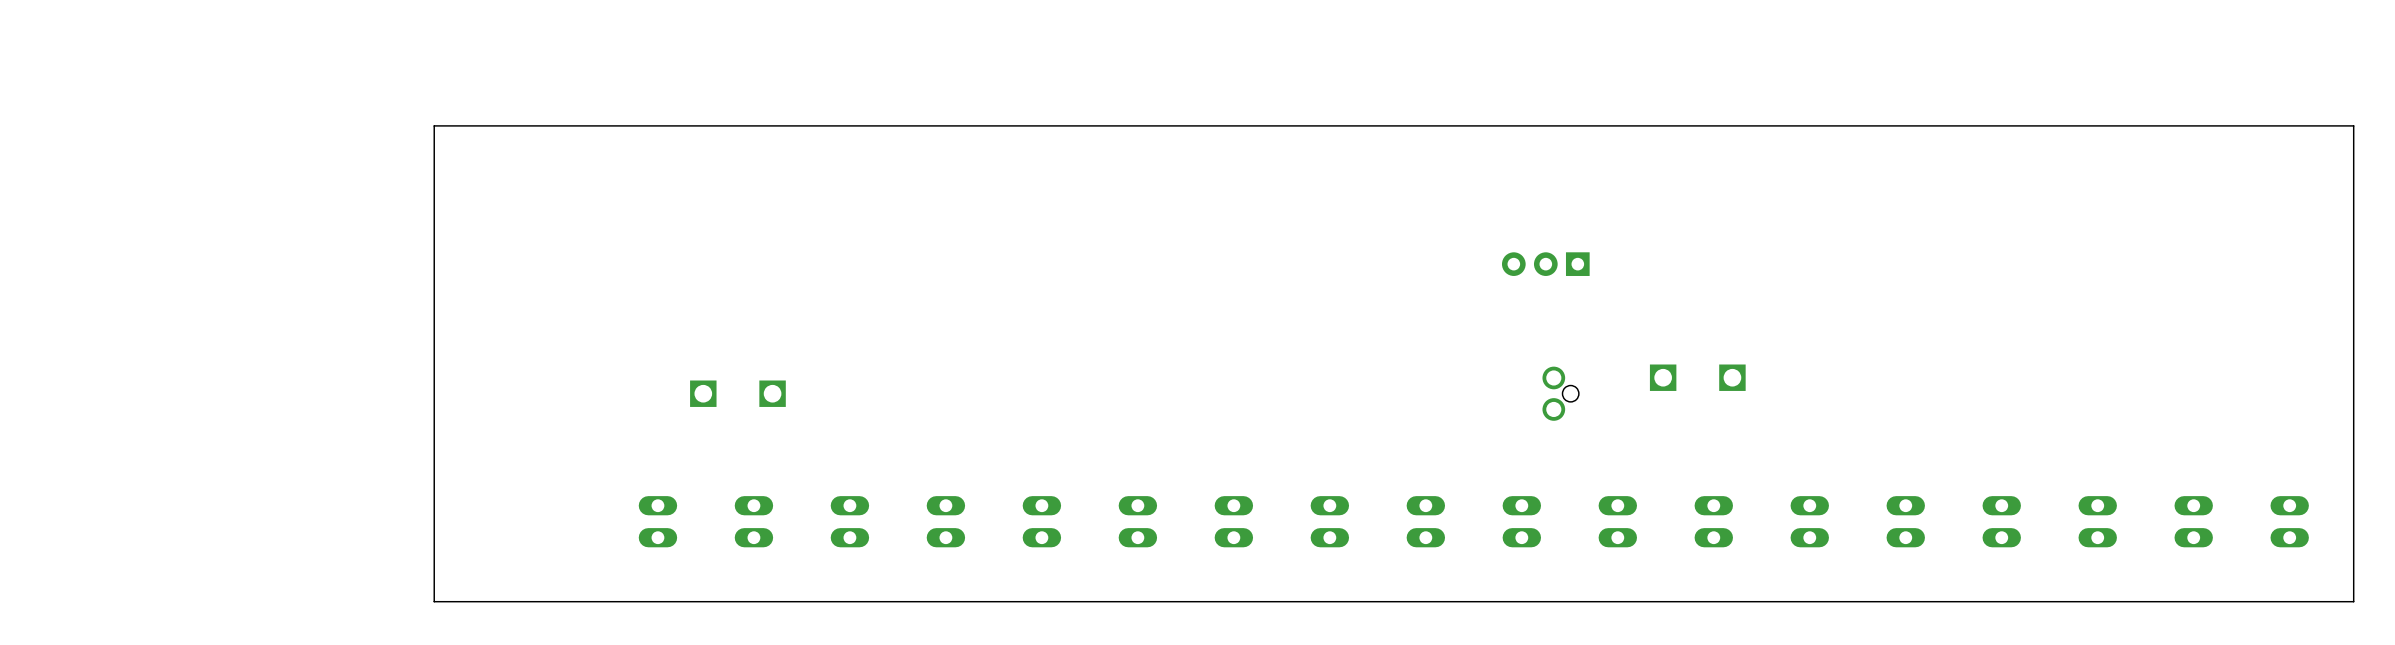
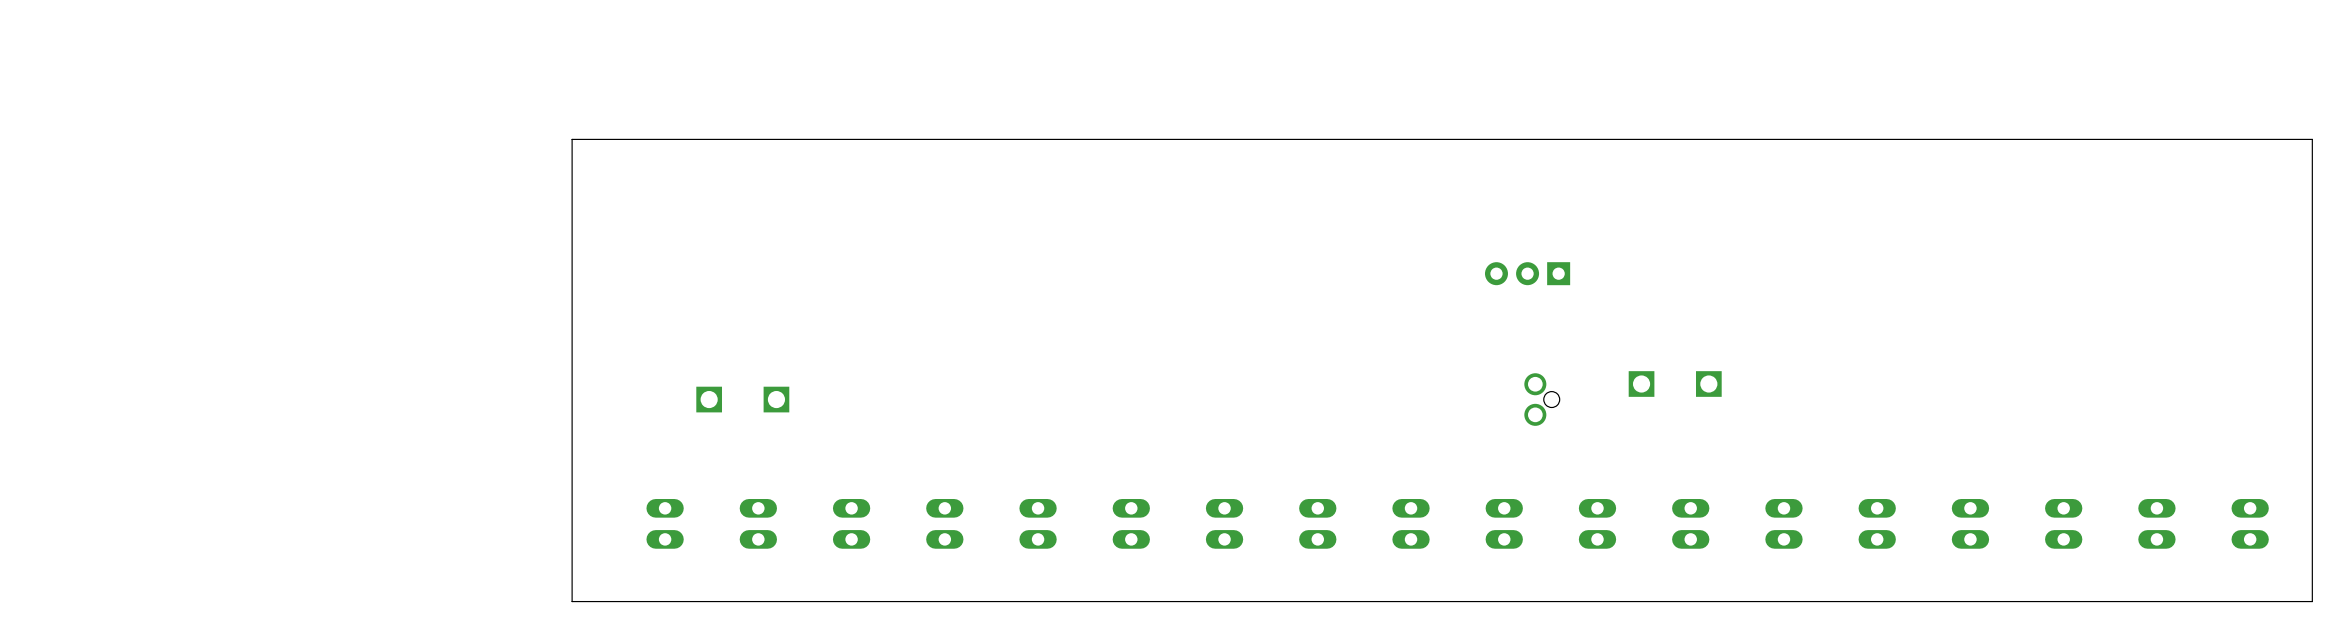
board edge: (562, 125) (434, 125) (434, 601) (562, 601) -> (572, 139) (572, 601)

